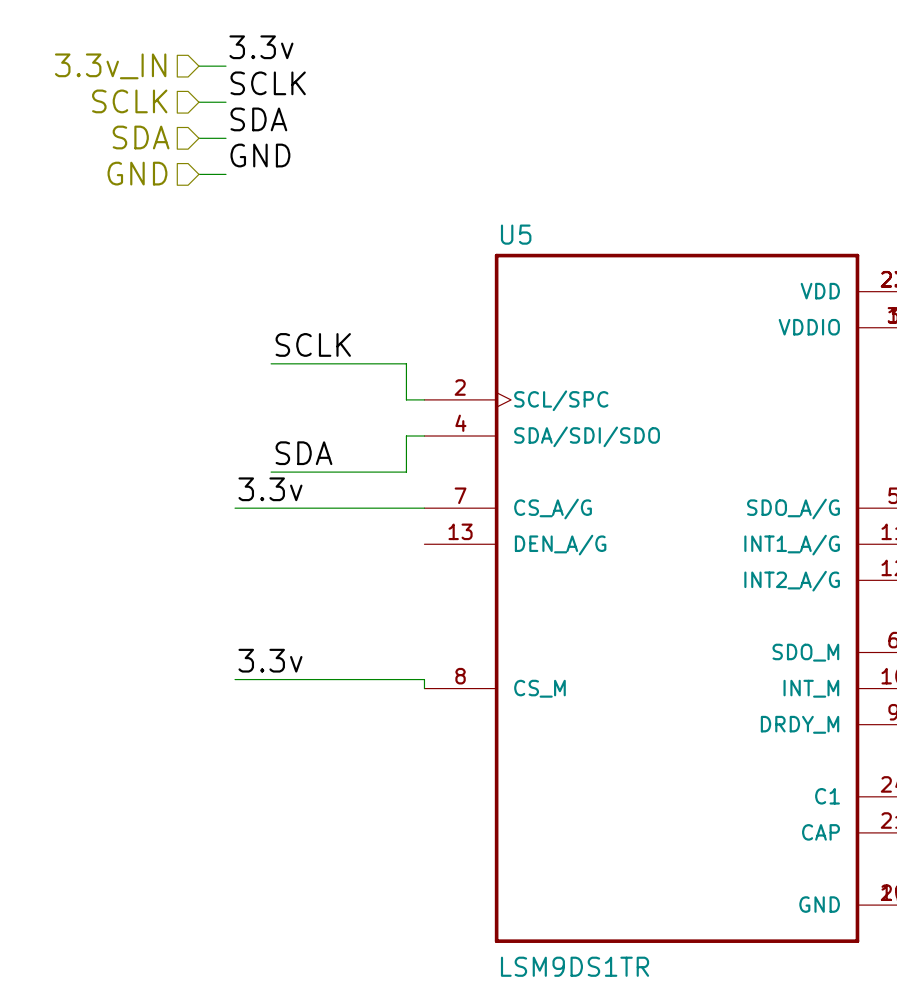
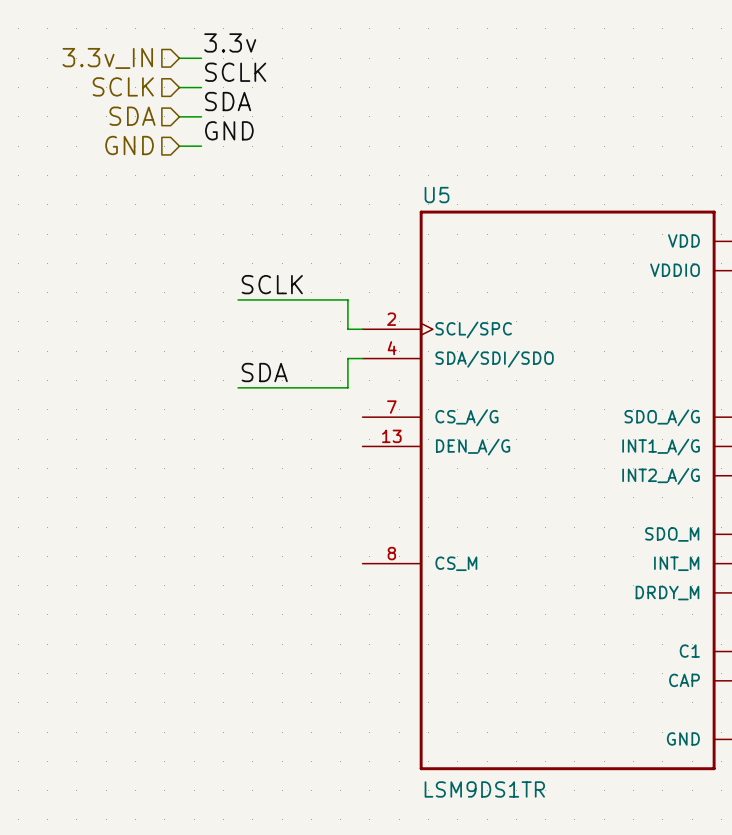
label: 3.3v (270, 489) -> none
wire: (235, 508) (424, 508) -> none
label: 3.3v (270, 660) -> none
wire: (235, 679) (424, 679) (424, 688) -> none

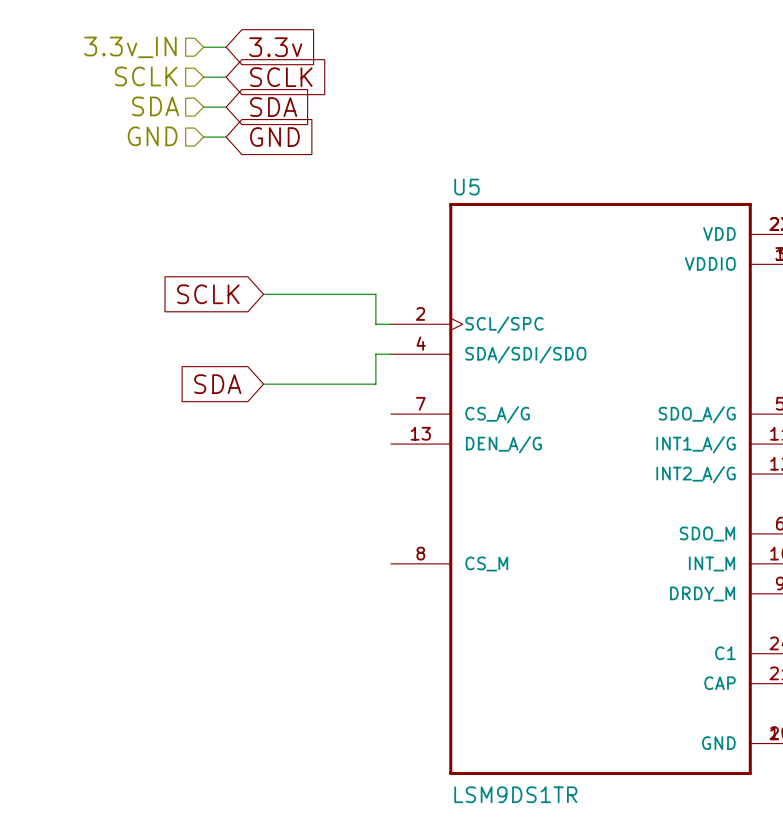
label: 3.3v (230, 42) -> none
global label: none -> 3.3v (275, 47)
label: SCLK (235, 72) -> none
global label: none -> SCLK (281, 77)
label: SDA (228, 101) -> none
global label: none -> SDA (273, 107)
label: GND (229, 130) -> none
global label: none -> GND (274, 137)
label: SCLK (272, 284) -> none
global label: none -> SCLK (208, 294)
label: SDA (264, 372) -> none
global label: none -> SDA (217, 384)

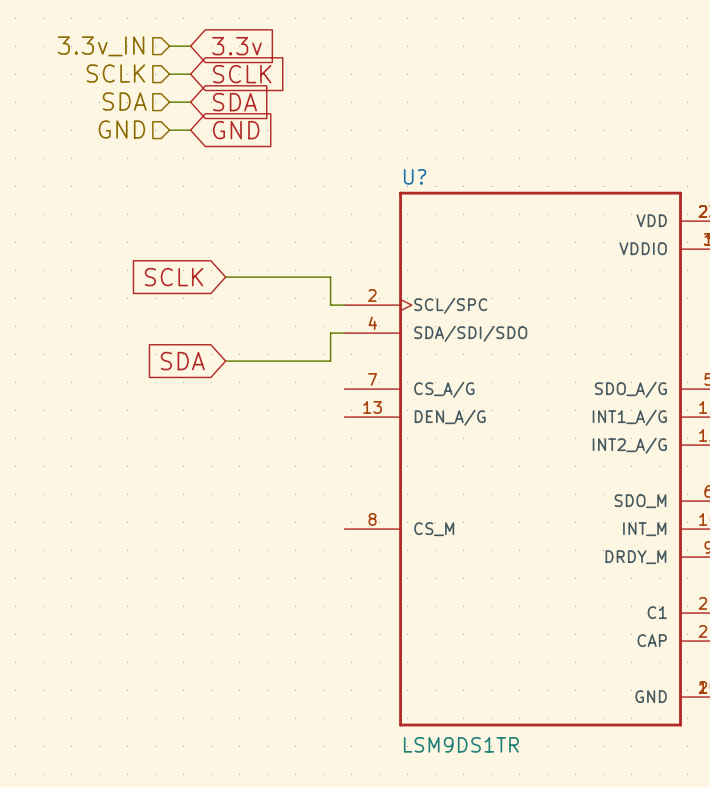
U5 name: U5 (466, 187) -> U? (415, 176)

